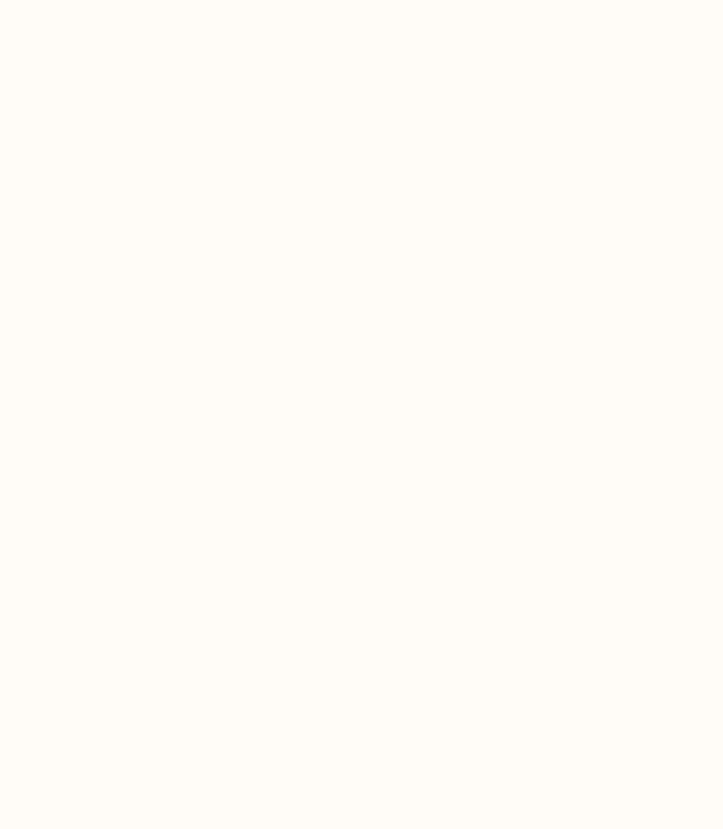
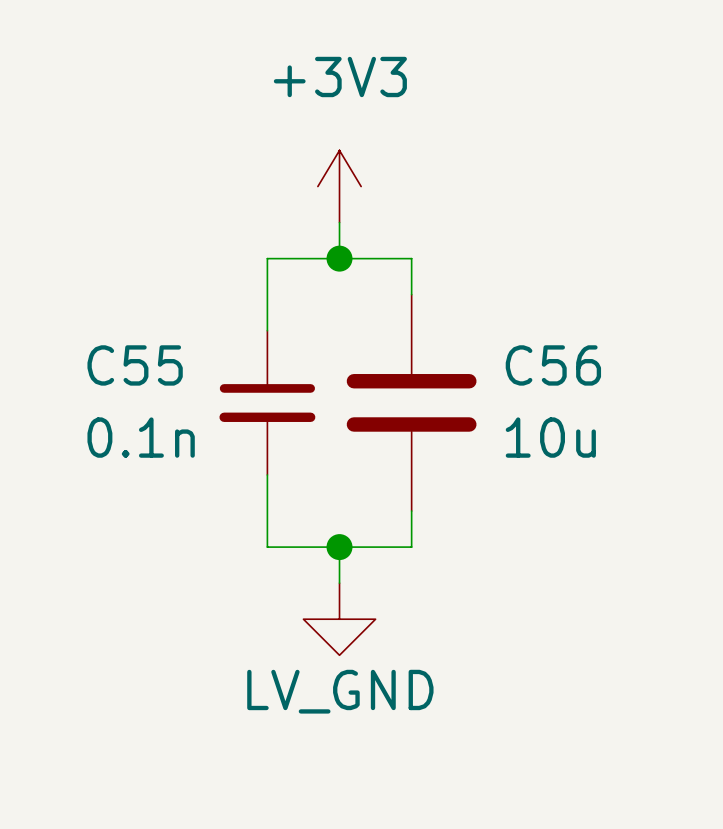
power symbol: none -> +3V3 (339, 186)
wire: none -> (339, 222) (339, 258)
junction: none -> (339, 258)
wire: none -> (411, 294) (411, 258) (267, 258) (267, 330)
C55: none -> 0.1n (267, 402)
C56: none -> 10u (411, 402)
wire: none -> (267, 474) (267, 547) (411, 547) (411, 511)
wire: none -> (339, 547) (339, 583)
junction: none -> (339, 547)
power symbol: none -> LV_GND (339, 619)

